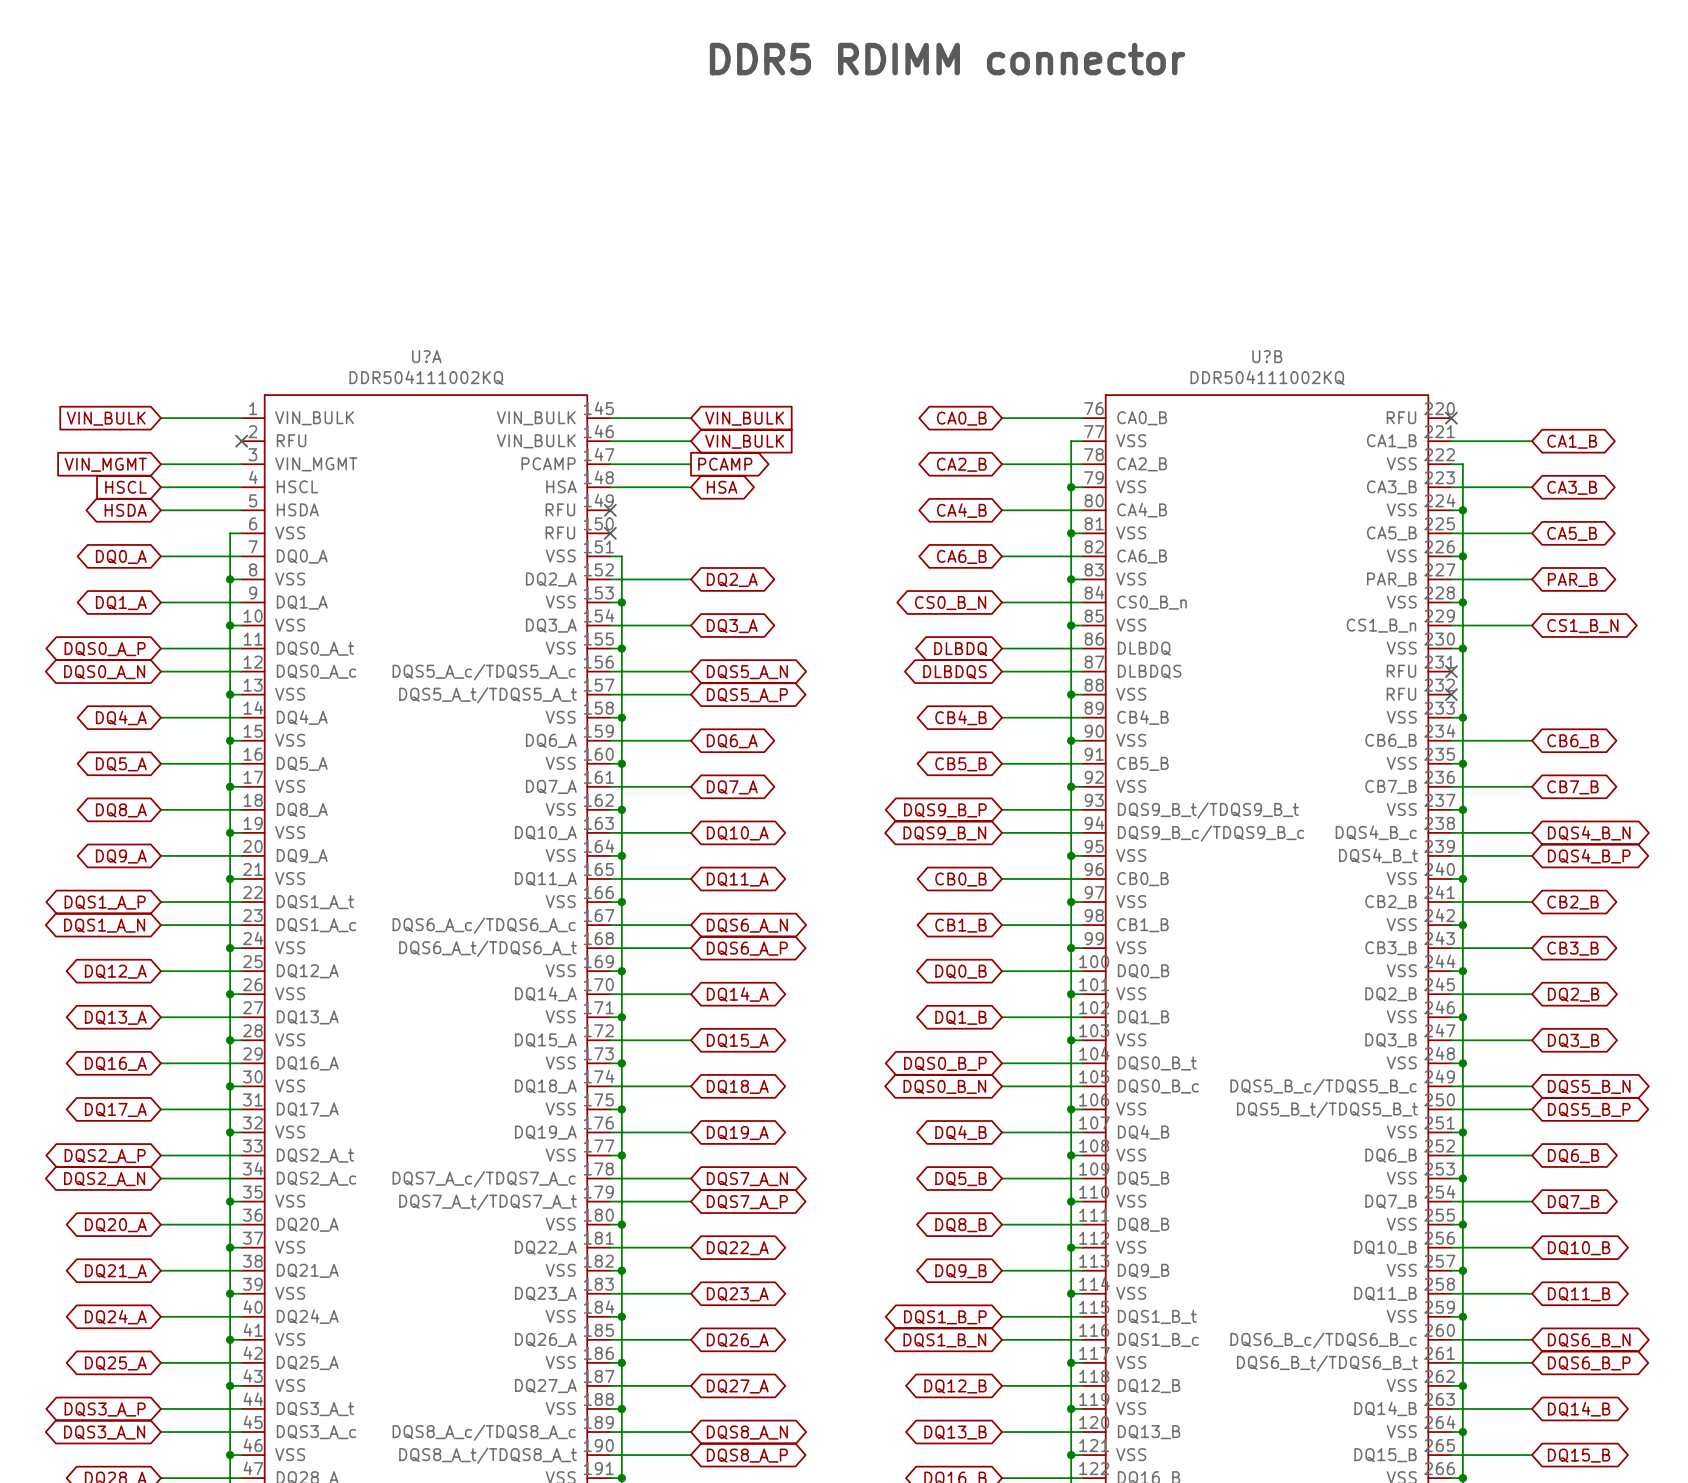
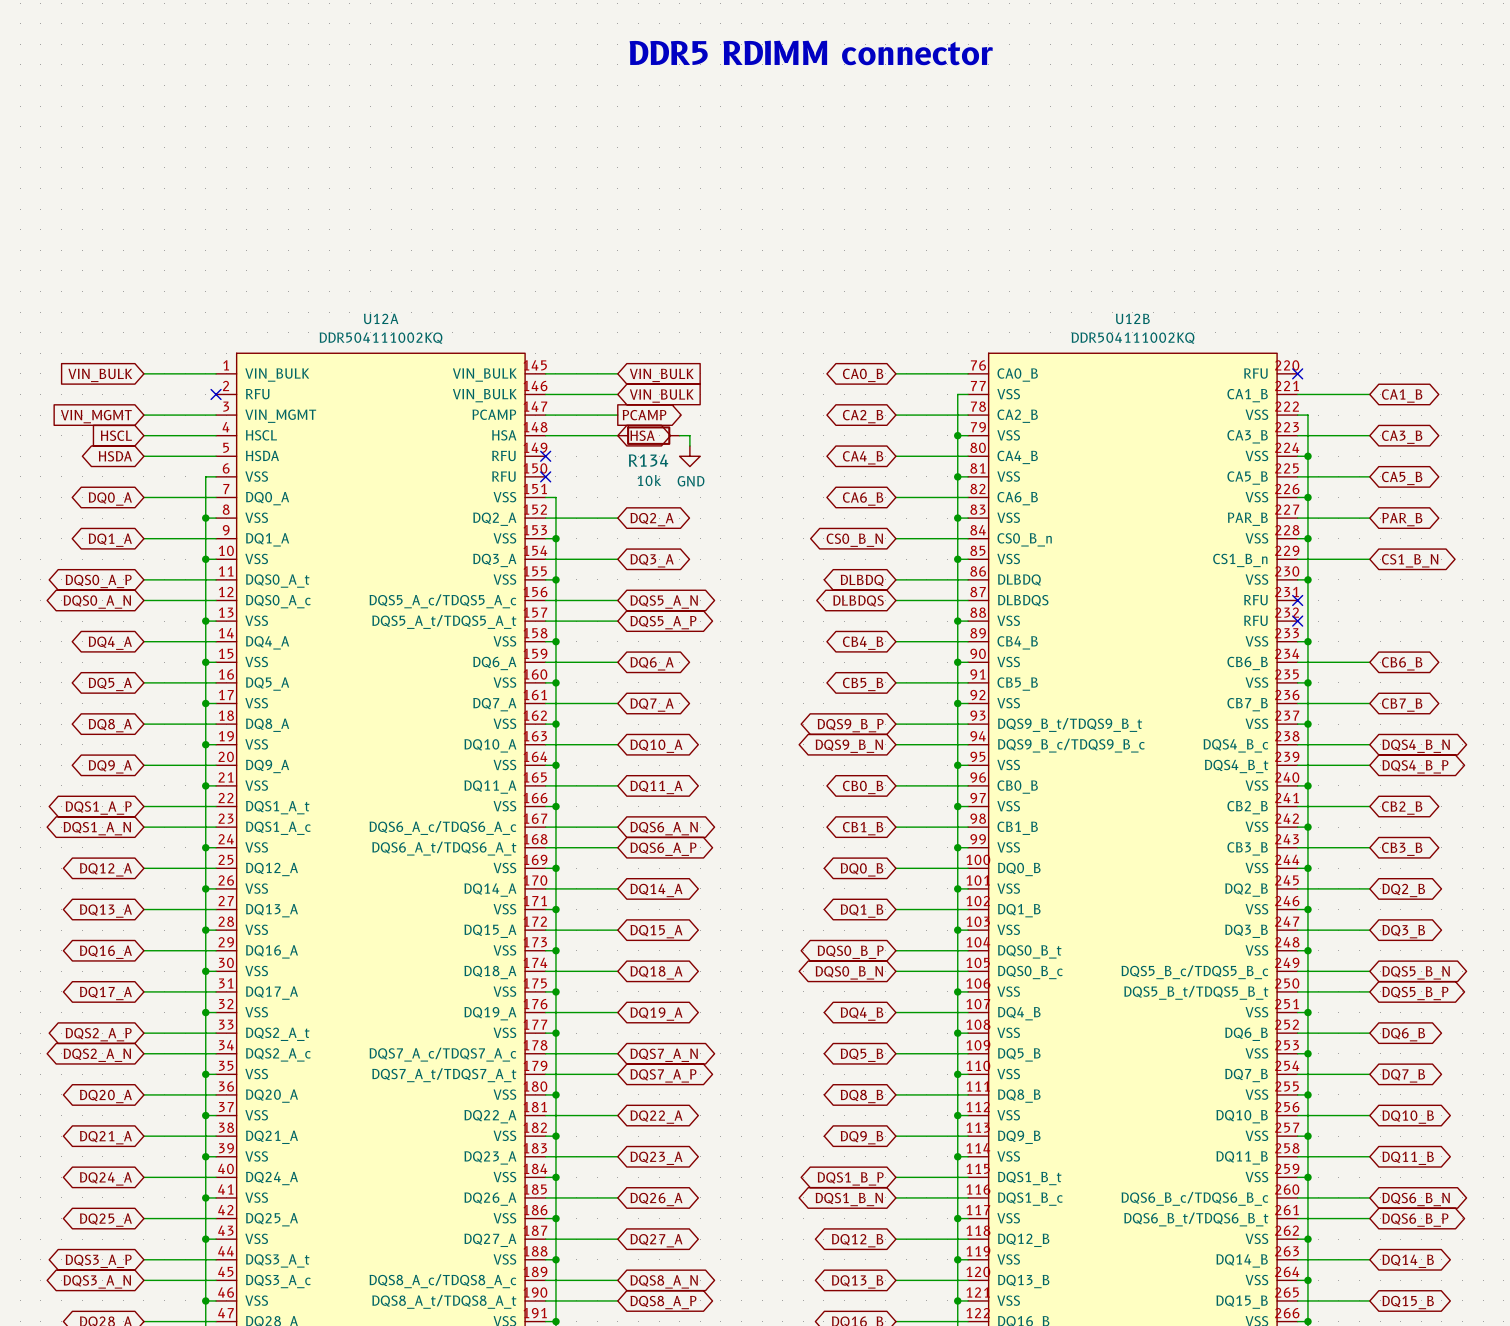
U?A name: U?A (426, 356) -> U12A (381, 318)
U?B name: U?B (1267, 356) -> U12B (1132, 318)
R134: none -> (648, 435)
wire: none -> (679, 435) (689, 435) (689, 445)
power symbol: none -> GND (689, 456)

